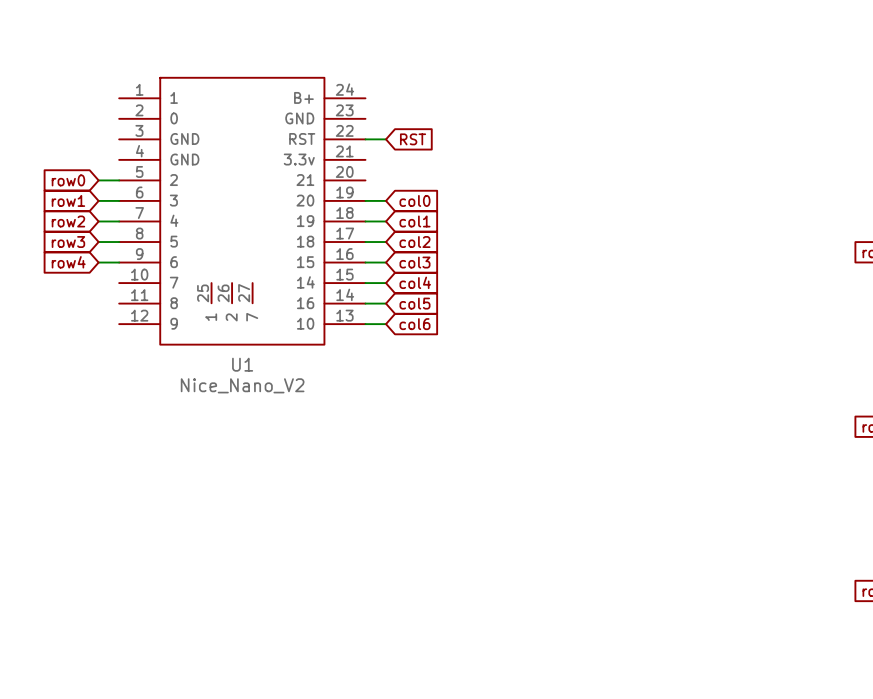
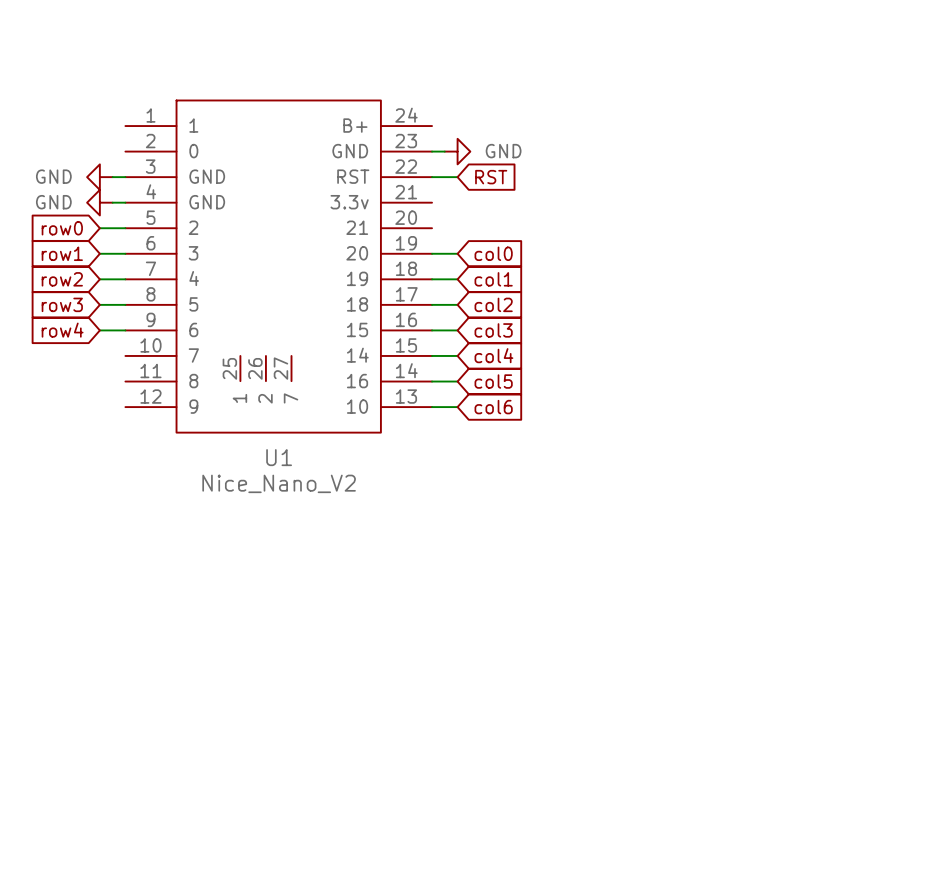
wire: none -> (432, 151) (444, 151)
power symbol: none -> GND (457, 151)
power symbol: none -> GND (99, 177)
wire: none -> (112, 177) (125, 177)
power symbol: none -> GND (99, 202)
wire: none -> (112, 202) (125, 202)

